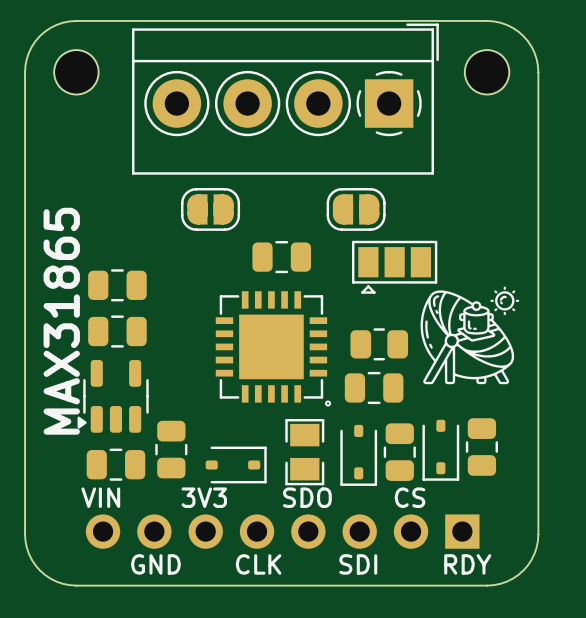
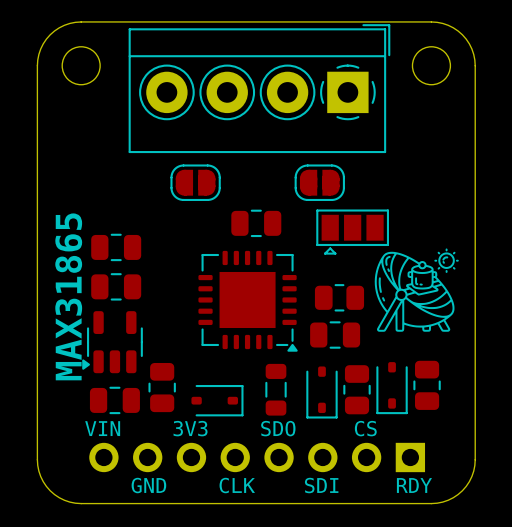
part footprint: [215, 291, 332, 407] -> [198, 250, 298, 352]
part footprint: [285, 419, 325, 486] -> [265, 363, 287, 416]

